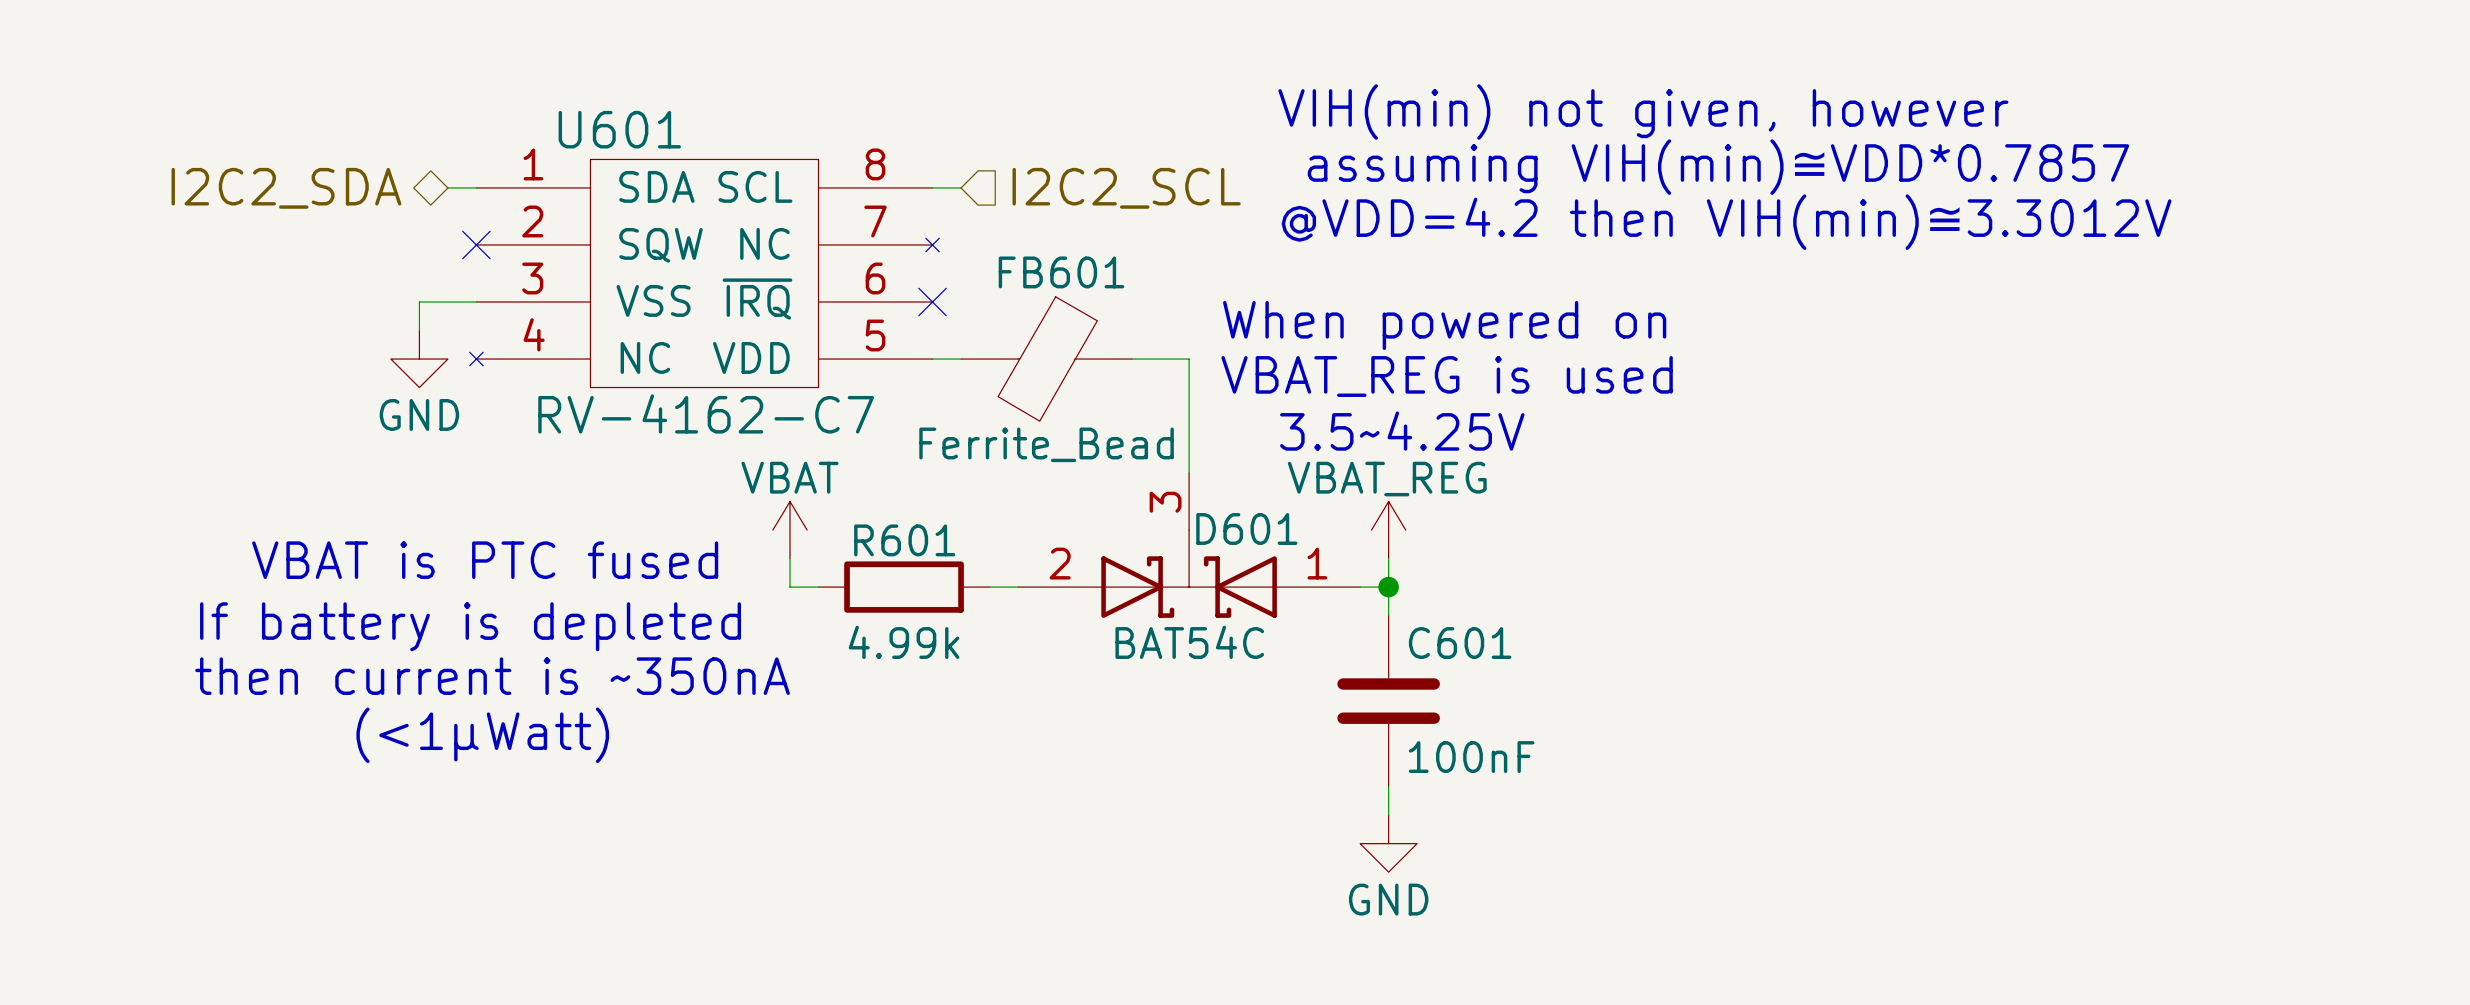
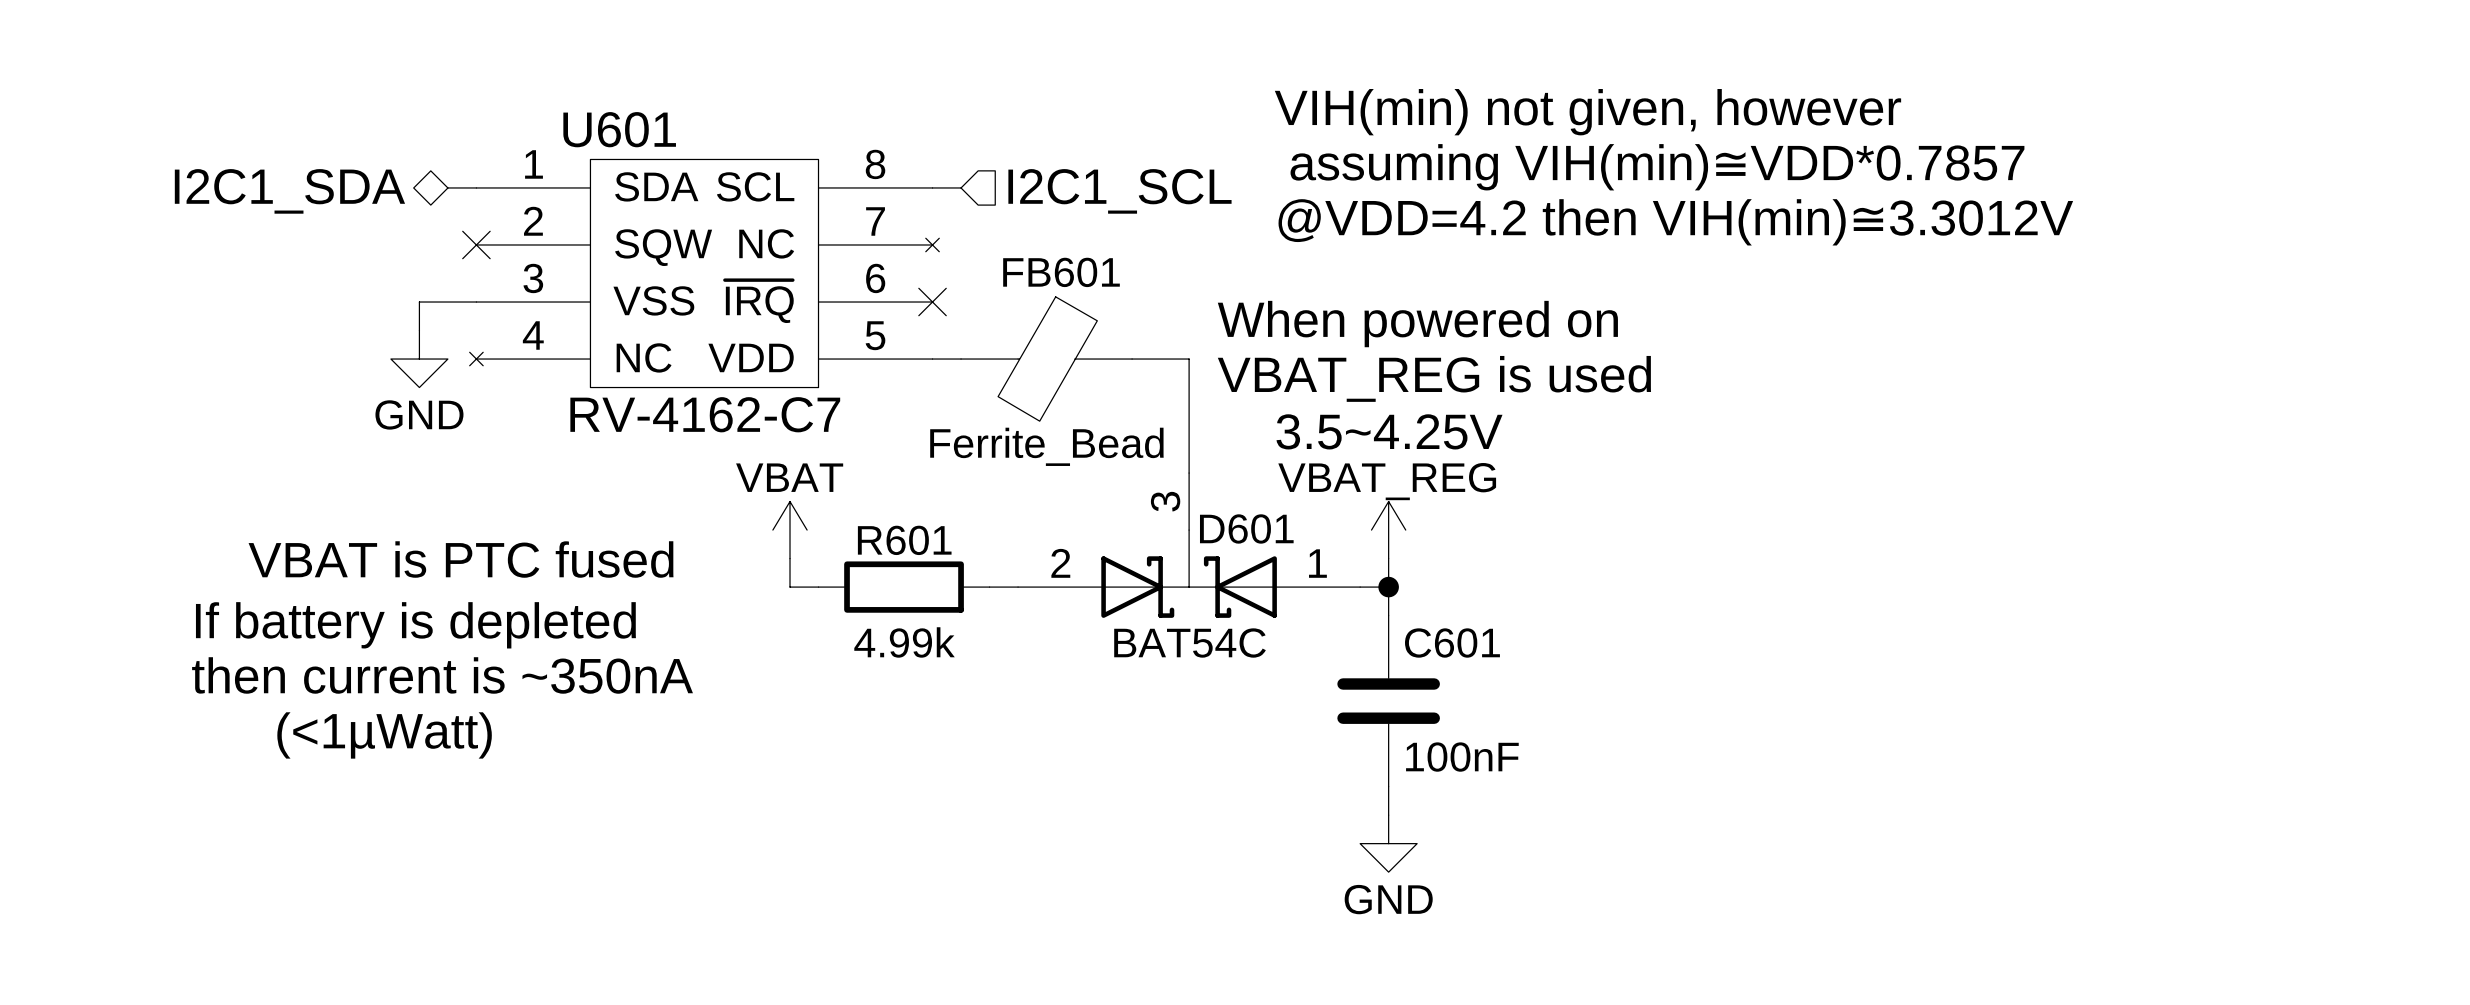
hierarchical label: I2C2_SDA (286, 188) -> I2C1_SDA (289, 191)
hierarchical label: I2C2_SCL (1126, 188) -> I2C1_SCL (1119, 191)

